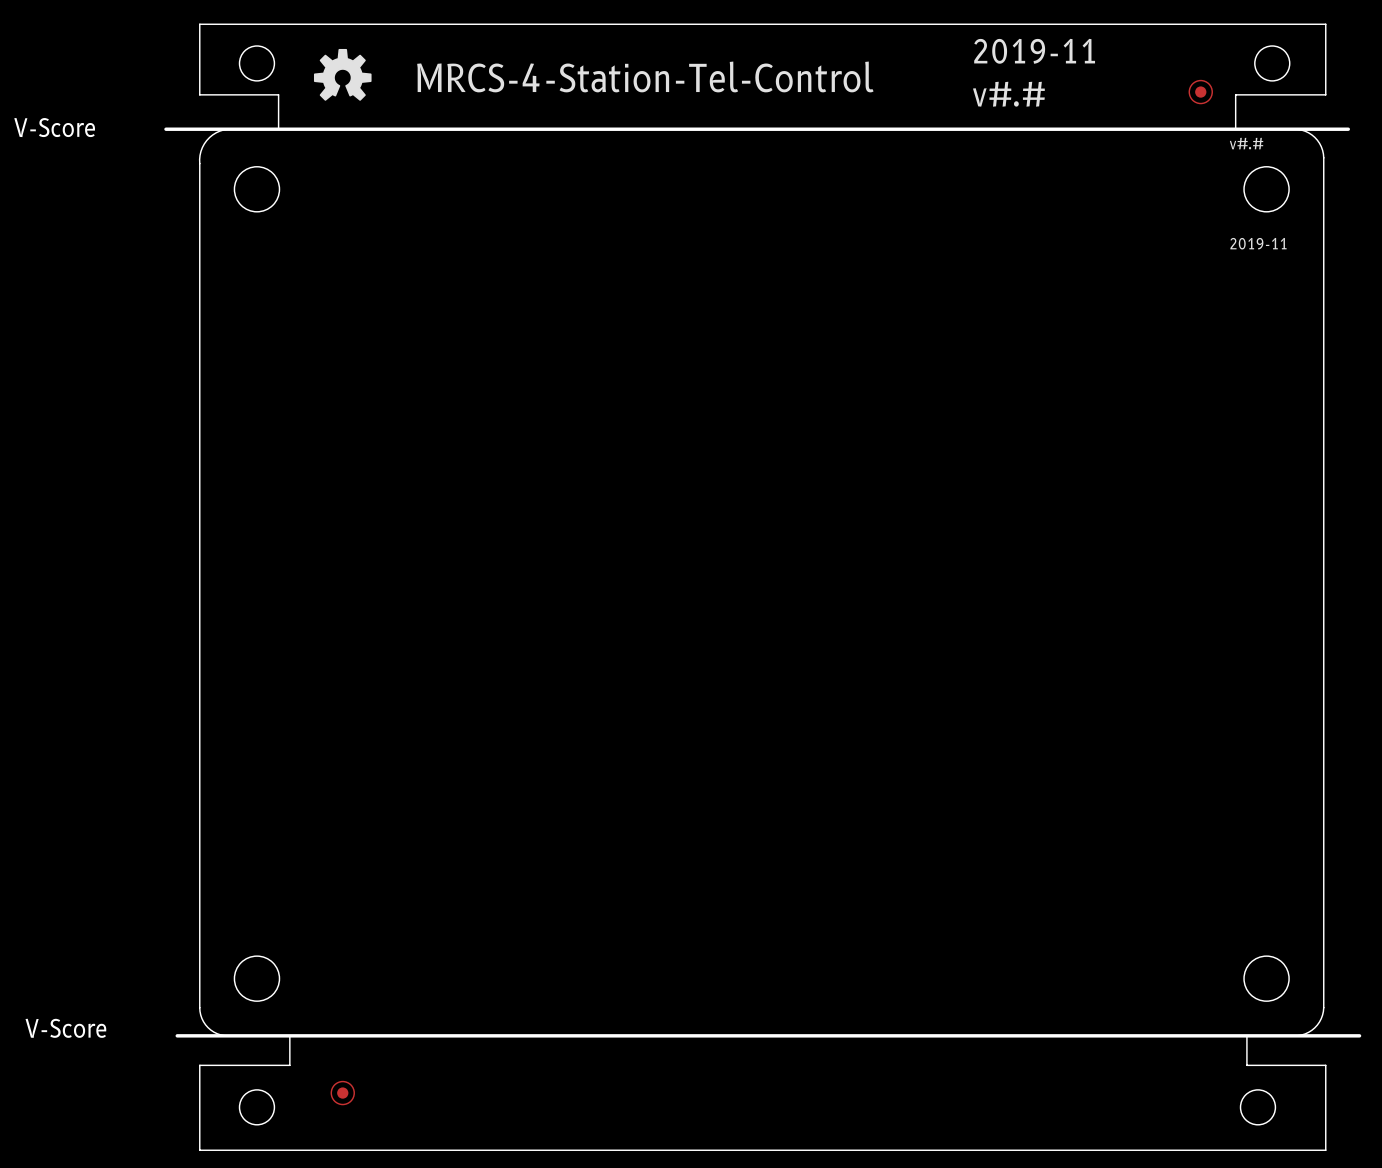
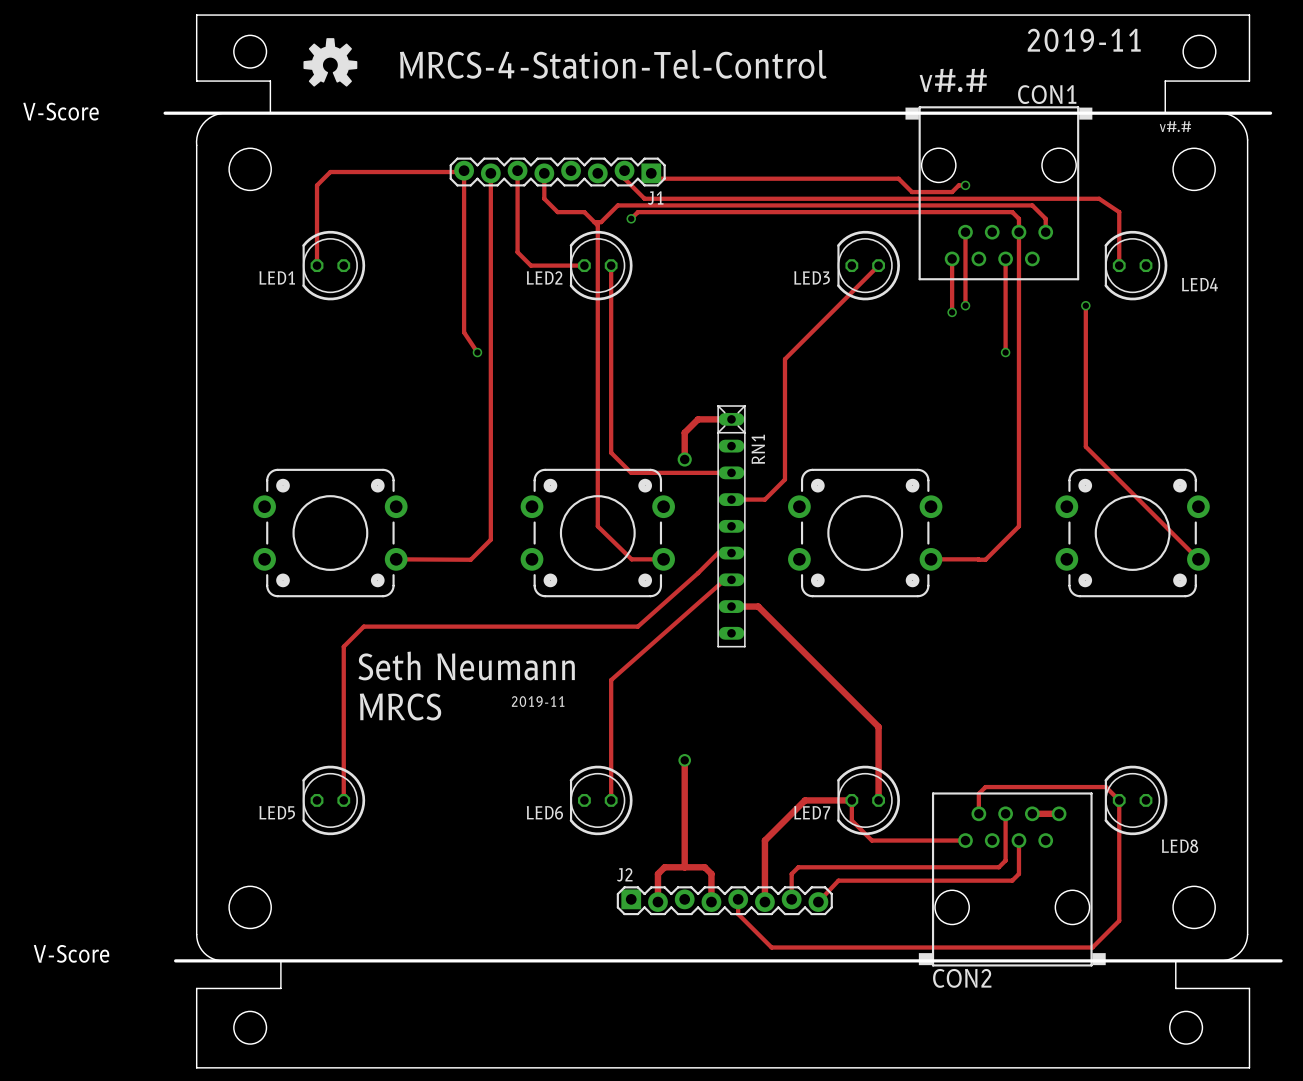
text position: 2019-11 (1034, 51) -> 2019-11 (1084, 40)
part: (1200, 92) -> none
track: none -> (517, 170) (517, 252) (530, 265) (584, 265)
track: none -> (624, 170) (624, 178) (644, 198) (1099, 198) (1119, 212) (1119, 265)
J1: none -> (557, 172)
track: none -> (490, 173) (490, 539) (470, 559) (396, 559)
track: none -> (544, 173) (544, 198) (557, 212) (584, 212) (597, 225) (597, 526) (631, 559) (663, 559)
track: none -> (651, 173) (656, 178) (898, 178) (912, 192) (952, 192) (958, 185) (965, 185)
via: none -> (965, 185)
CON1: none -> (998, 193)
track: none -> (631, 218) (637, 212) (1012, 212) (1018, 218) (1018, 526) (985, 559) (931, 559)
via: none -> (631, 218)
text: 2019-11 (1258, 243) -> none
track: none -> (594, 222) (601, 222) (617, 205) (1032, 205) (1045, 218) (1045, 232)
track: none -> (965, 232) (965, 305)
track: none -> (952, 258) (952, 312)
track: none -> (1005, 258) (1005, 352)
track: none -> (317, 265) (317, 185) (330, 172) (464, 172) (464, 332) (477, 352)
LED1: none -> (333, 265)
LED2: none -> (601, 265)
track: none -> (611, 265) (611, 452) (631, 472) (731, 472)
LED3: none -> (868, 265)
track: none -> (878, 265) (784, 359) (784, 479) (764, 499) (731, 499)
LED4: none -> (1135, 265)
via: none -> (965, 305)
track: none -> (1085, 305) (1085, 446) (1198, 559)
via: none -> (1085, 305)
via: none -> (952, 312)
via: none -> (477, 352)
via: none -> (1005, 352)
track: none -> (731, 419) (698, 419) (684, 432) (684, 459)
via: none -> (684, 459)
RN1: none -> (731, 526)
part: none -> (330, 533)
part: none -> (597, 533)
part: none -> (865, 533)
part: none -> (1132, 533)
track: none -> (731, 553) (718, 553) (637, 626) (363, 626) (343, 646) (343, 800)
track: none -> (731, 579) (724, 579) (611, 680) (611, 800)
track: none -> (731, 606) (758, 606) (878, 726) (878, 800)
text: none -> Seth Neumann (466, 666)
text: none -> 2019-11 (538, 701)
text: none -> MRCS (400, 706)
track: none -> (684, 760) (684, 867)
via: none -> (684, 760)
LED5: none -> (333, 800)
LED6: none -> (601, 800)
LED7: none -> (868, 800)
LED8: none -> (1135, 800)
track: none -> (978, 813) (978, 793) (985, 787) (1105, 787) (1119, 800) (1119, 920) (1092, 947) (771, 947) (738, 914) (738, 899)
track: none -> (1005, 813) (1005, 860) (998, 867) (798, 867) (791, 873) (791, 899)
track: none -> (1032, 813) (1059, 813)
track: none -> (965, 840) (871, 840) (851, 820) (851, 800) (805, 800) (764, 840) (764, 902)
track: none -> (1018, 840) (1018, 873) (1012, 880) (838, 880) (818, 902)
CON2: none -> (1012, 879)
J2: none -> (724, 900)
track: none -> (657, 902) (657, 873) (664, 867) (704, 867) (711, 873) (711, 902)
part: (342, 1093) -> none

